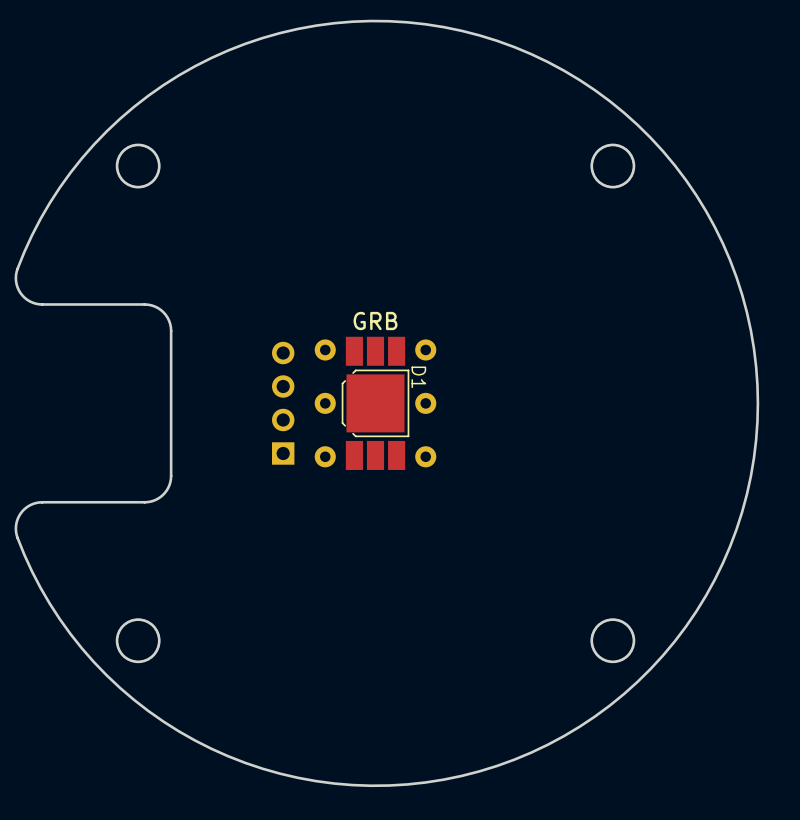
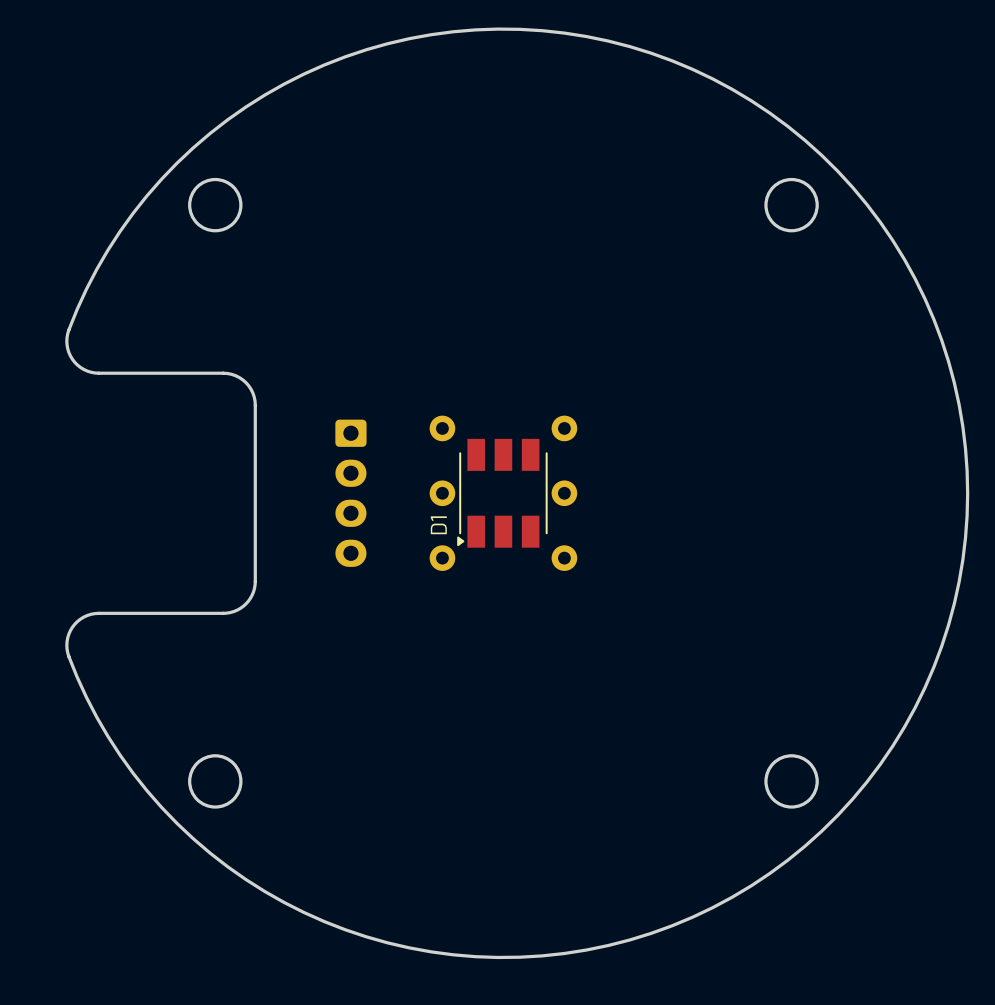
text: GRB (375, 321) -> none
D1 footprint: [341, 336, 410, 470] -> [457, 438, 548, 548]
D1 name position: D1 (418, 377) -> D1 (438, 525)
part: none -> (350, 493)
part: (283, 403) -> none

